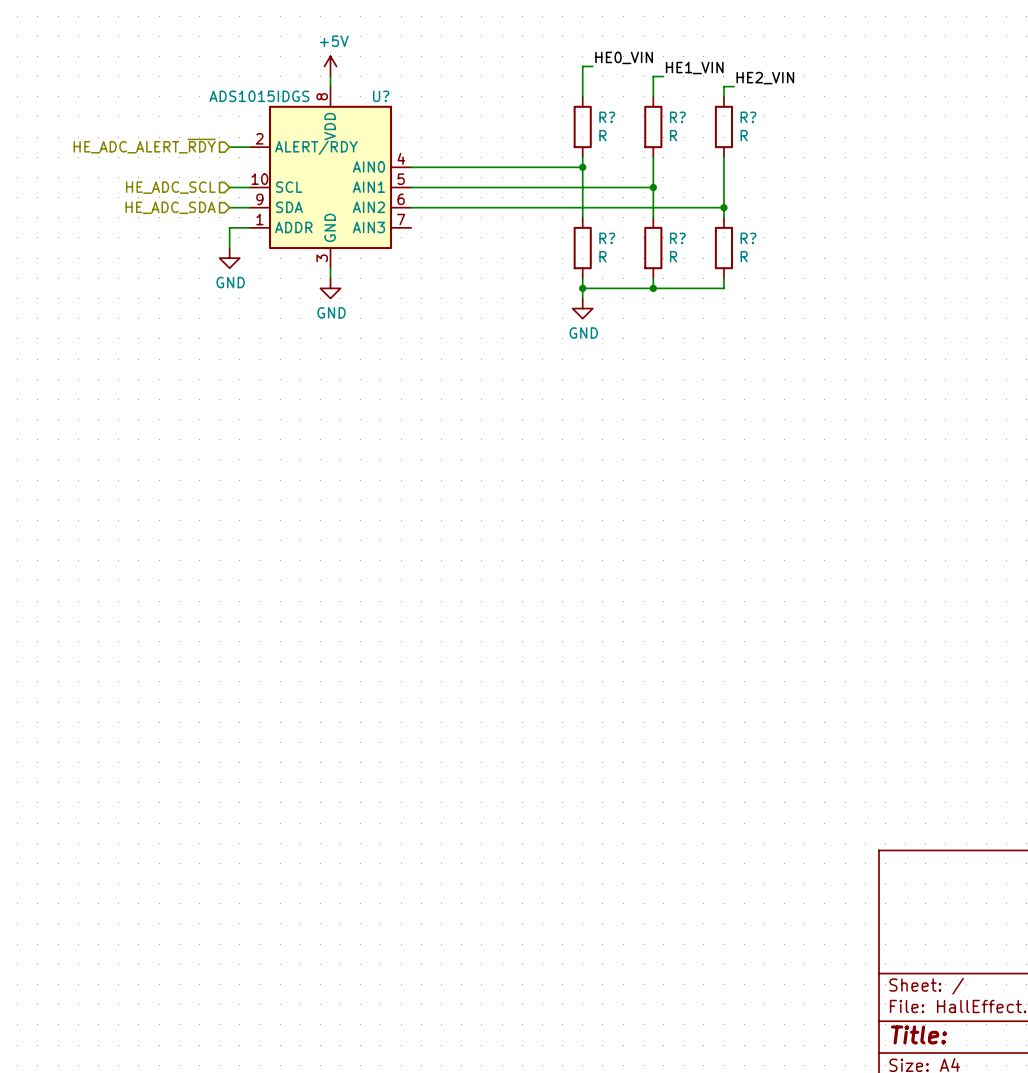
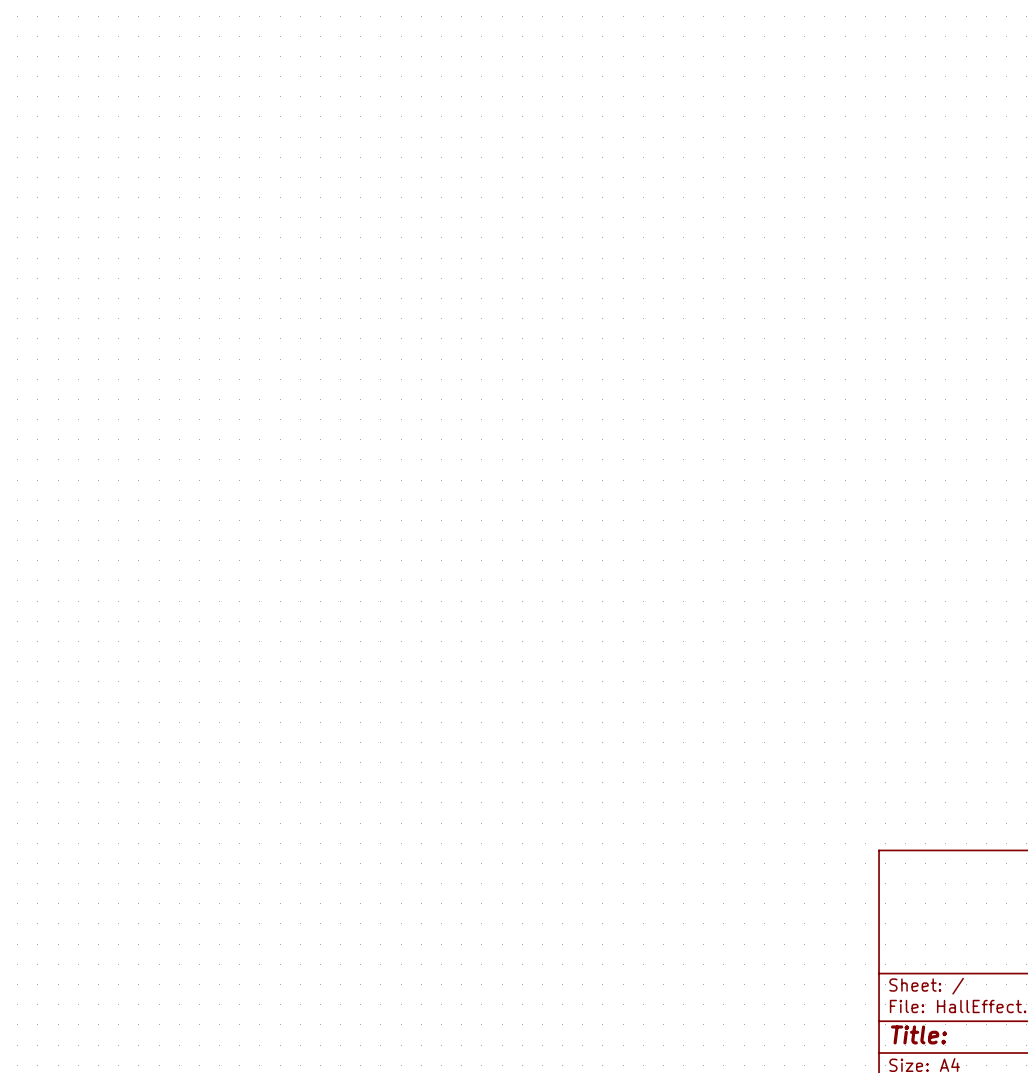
label: HE0_VIN (624, 57) -> none
power symbol: +5V (330, 66) -> none
wire: (592, 66) (582, 66) (582, 96) -> none
label: HE1_VIN (694, 68) -> none
wire: (330, 76) (330, 86) -> none
wire: (663, 76) (653, 76) (653, 96) -> none
label: HE2_VIN (765, 78) -> none
wire: (734, 86) (723, 86) (723, 96) -> none
R?: R (582, 126) -> none
R?: R (653, 126) -> none
R?: R (723, 126) -> none
hierarchical label: HE_ADC_ALERT_~{RDY} (144, 146) -> none
wire: (229, 147) (249, 147) -> none
wire: (582, 157) (582, 217) -> none
wire: (653, 157) (653, 217) -> none
wire: (723, 157) (723, 217) -> none
wire: (411, 167) (582, 167) -> none
junction: (582, 167) -> none
U?: ADS1015IDGS (330, 177) -> none
hierarchical label: HE_ADC_SCL (170, 187) -> none
wire: (229, 187) (249, 187) -> none
wire: (411, 187) (653, 187) -> none
junction: (653, 187) -> none
hierarchical label: HE_ADC_SDA (170, 207) -> none
wire: (229, 207) (249, 207) -> none
wire: (411, 207) (723, 207) -> none
junction: (723, 207) -> none
wire: (249, 227) (229, 227) (229, 248) -> none
R?: R (582, 248) -> none
R?: R (653, 248) -> none
R?: R (723, 248) -> none
power symbol: GND (229, 258) -> none
wire: (330, 268) (330, 278) -> none
wire: (582, 278) (582, 298) -> none
wire: (653, 278) (653, 288) -> none
wire: (723, 278) (723, 288) (582, 288) -> none
power symbol: GND (330, 288) -> none
junction: (582, 288) -> none
junction: (653, 288) -> none
power symbol: GND (582, 308) -> none

